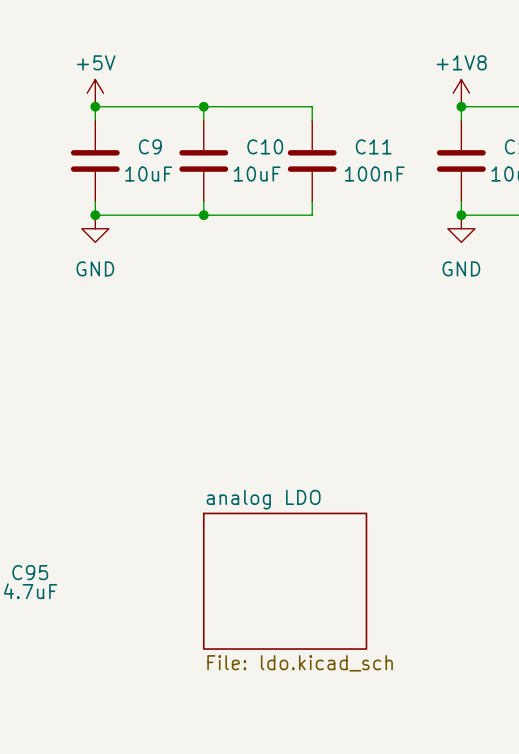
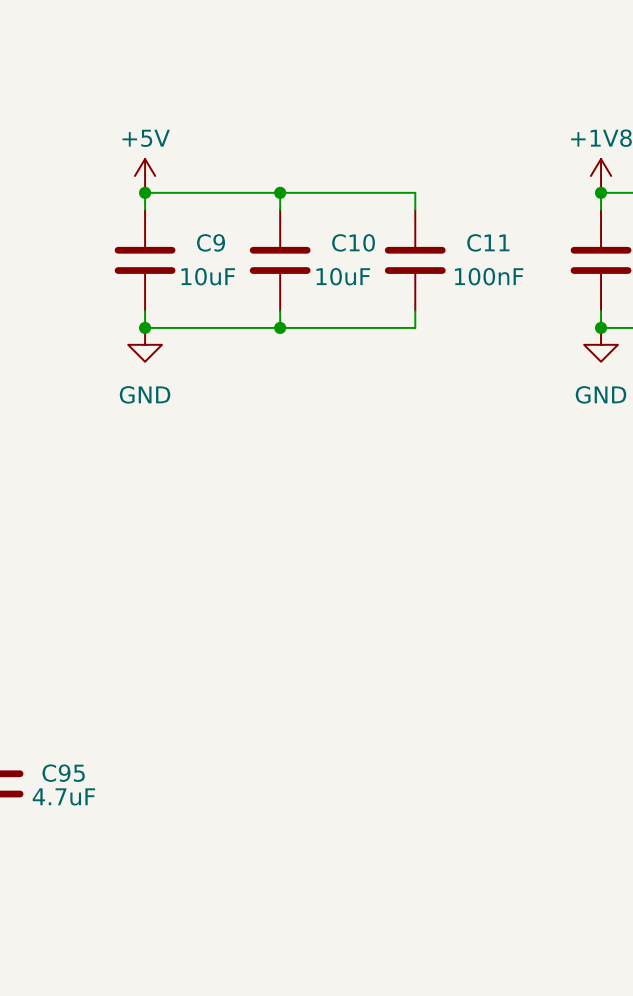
sheet analog LDO: File: ldo.kicad_sch (285, 581) -> none

